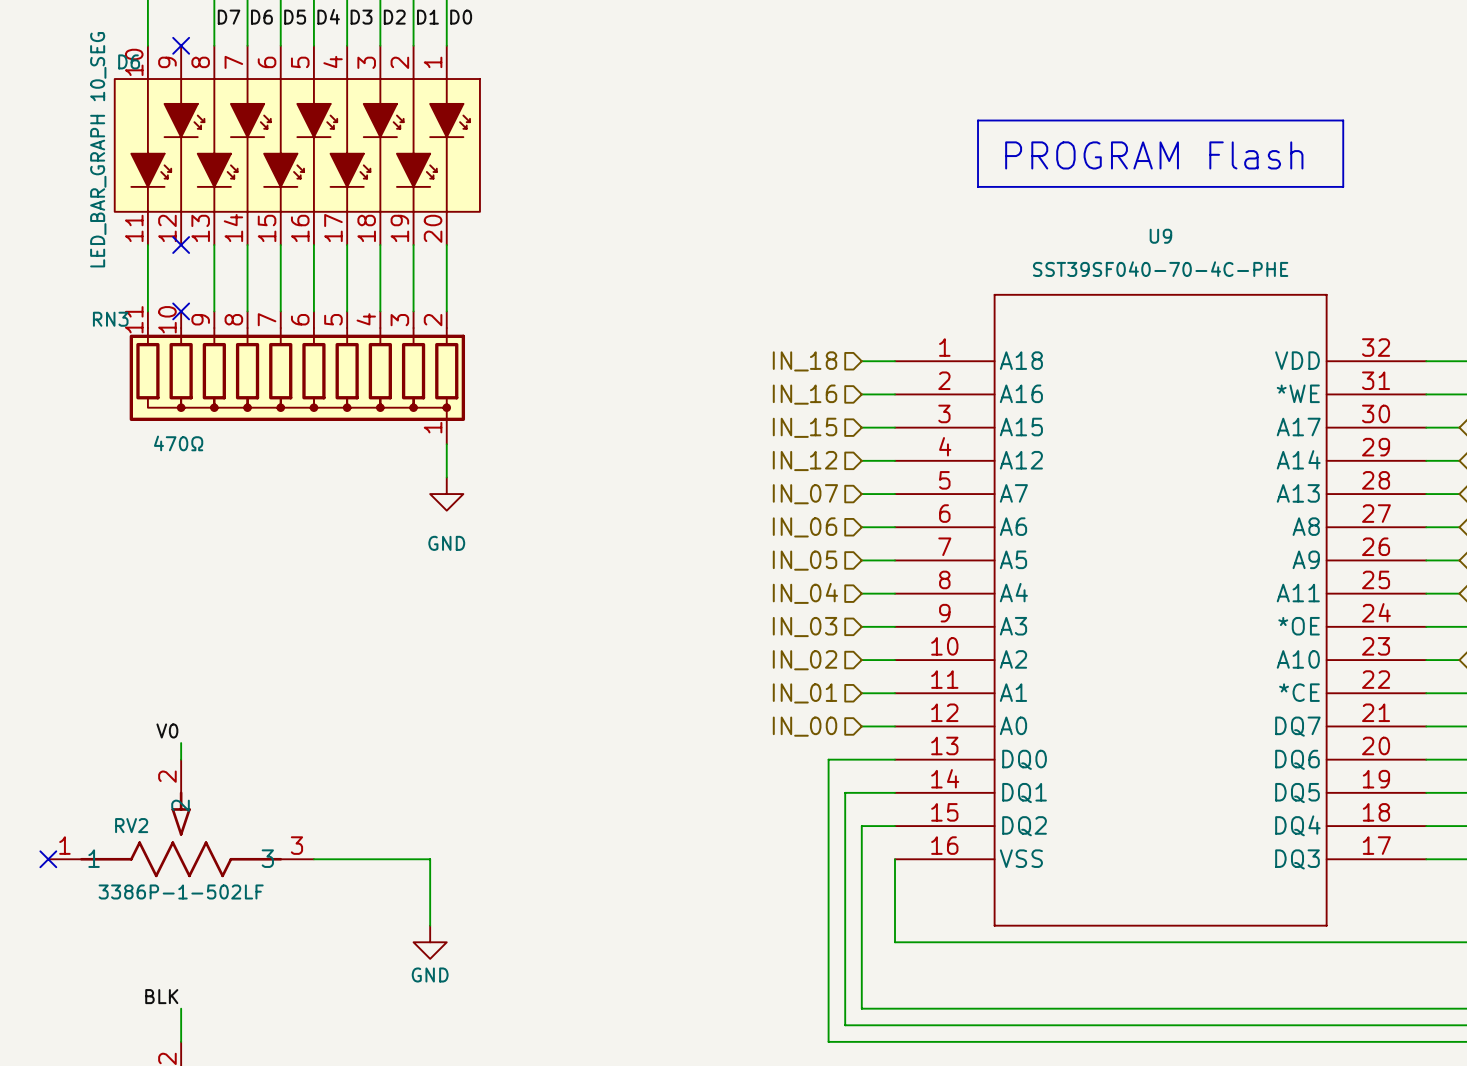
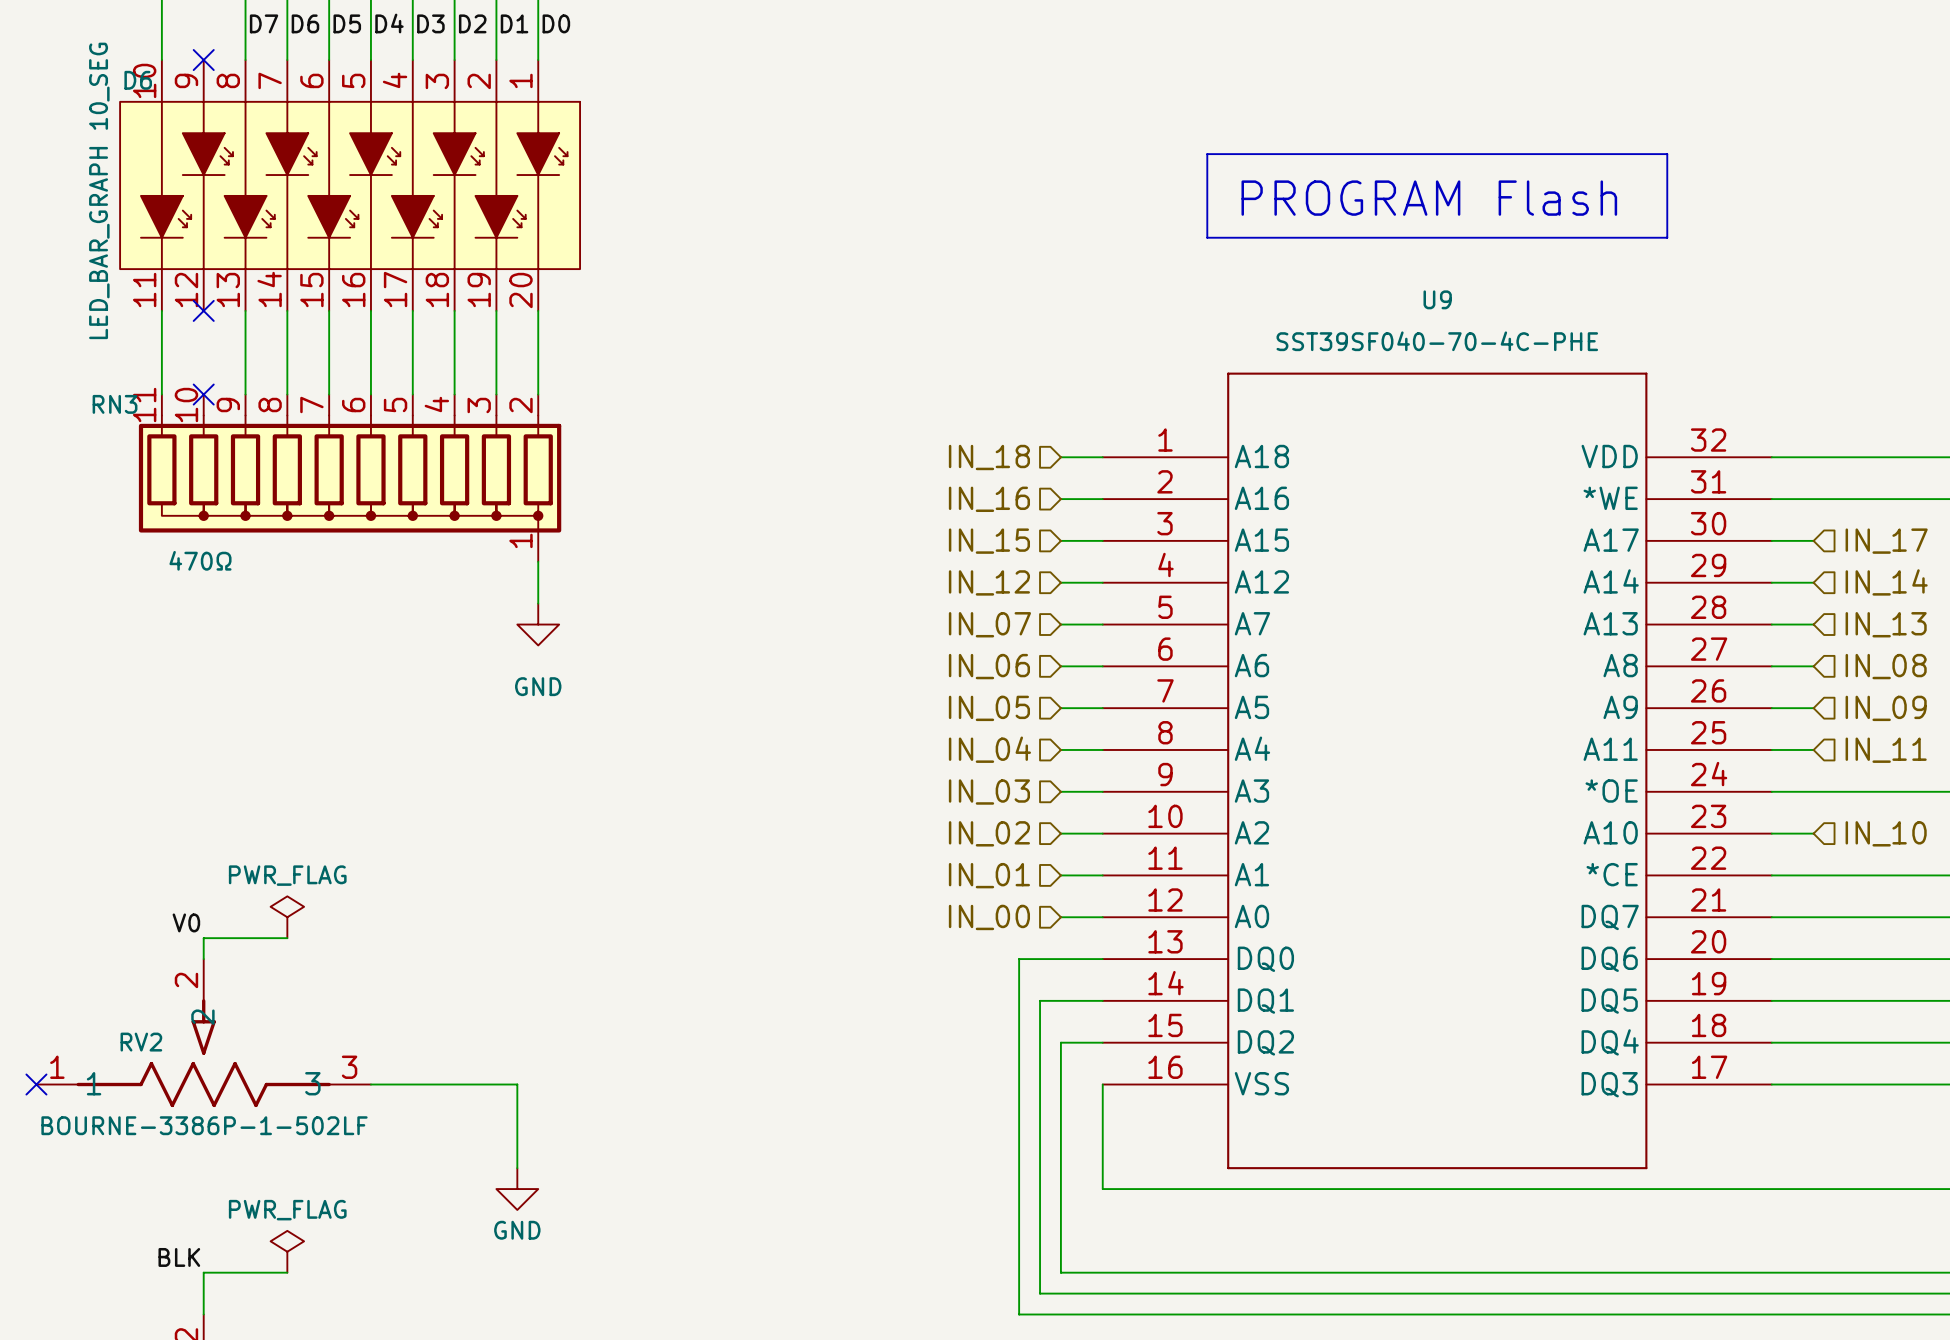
power symbol: none -> PWR_FLAG (287, 917)
wire: none -> (203, 938) (287, 938)
RV2 value: 3386P-1-502LF (181, 891) -> BOURNE-3386P-1-502LF (204, 1125)
power symbol: none -> PWR_FLAG (287, 1251)
wire: none -> (203, 1272) (287, 1272)

